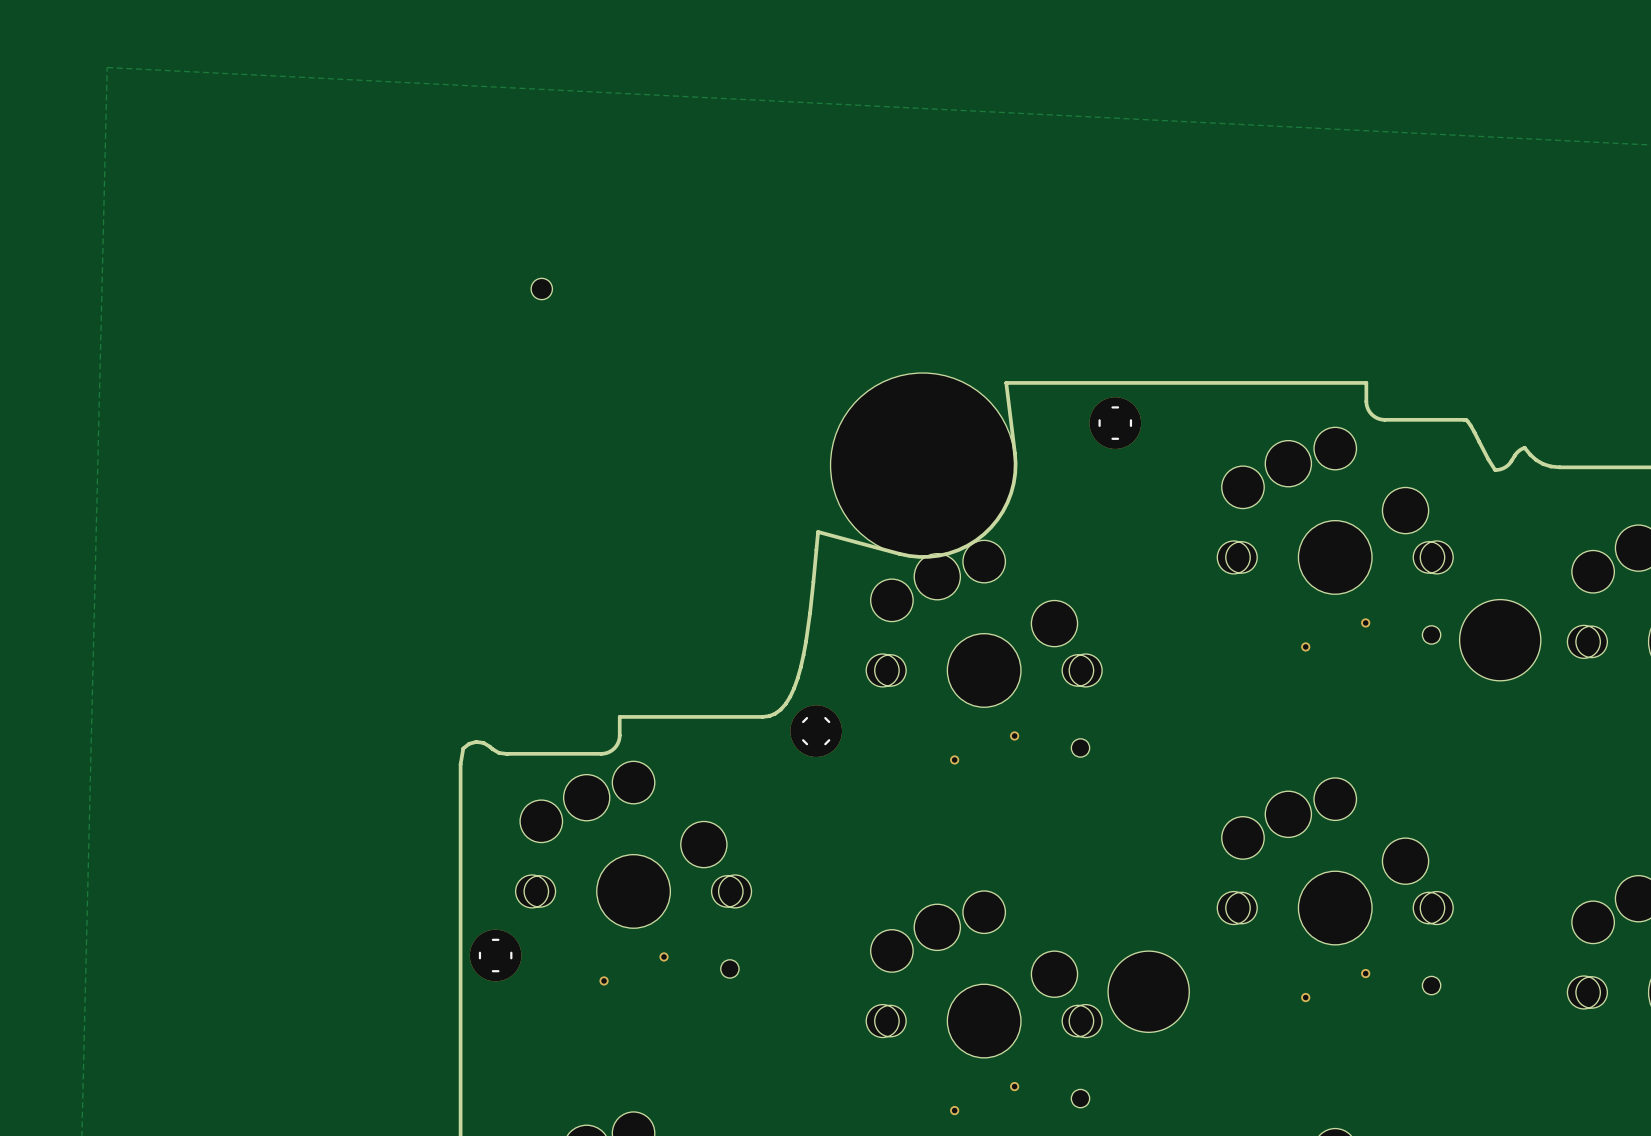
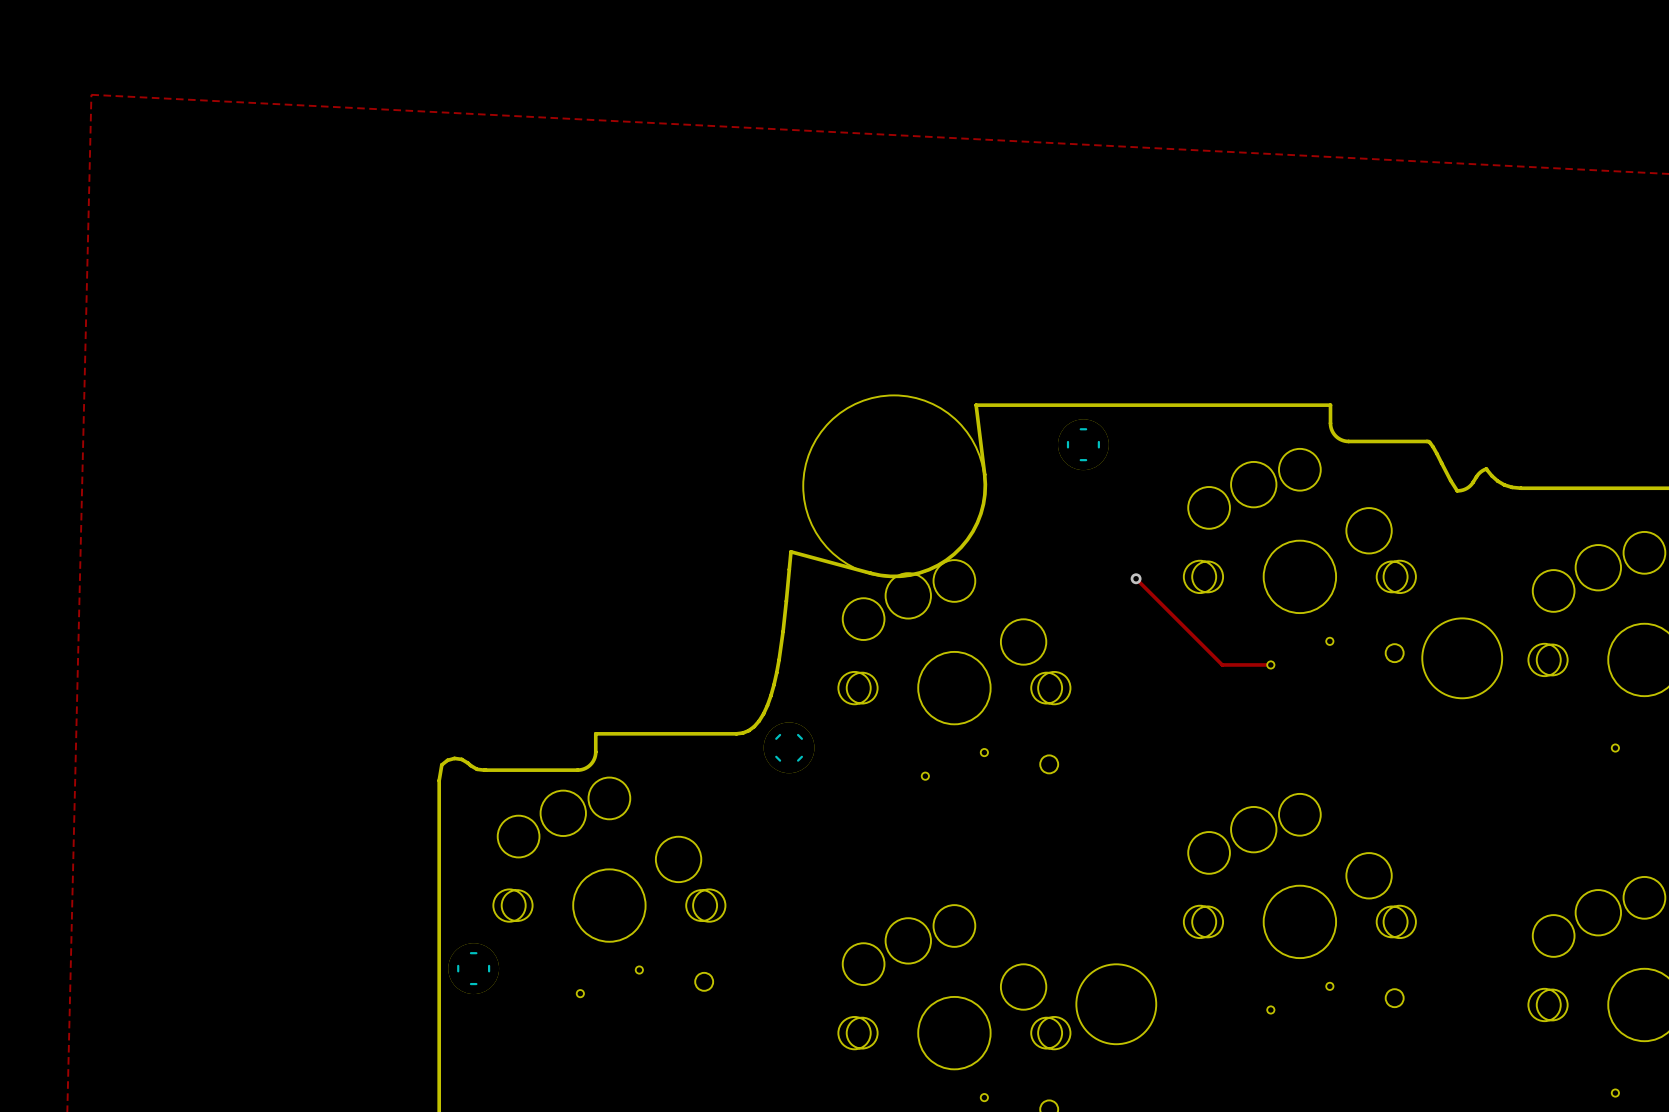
part: (541, 288) -> none
track: none -> (1136, 578) (1222, 664) (1270, 664)
via: none -> (1136, 578)

